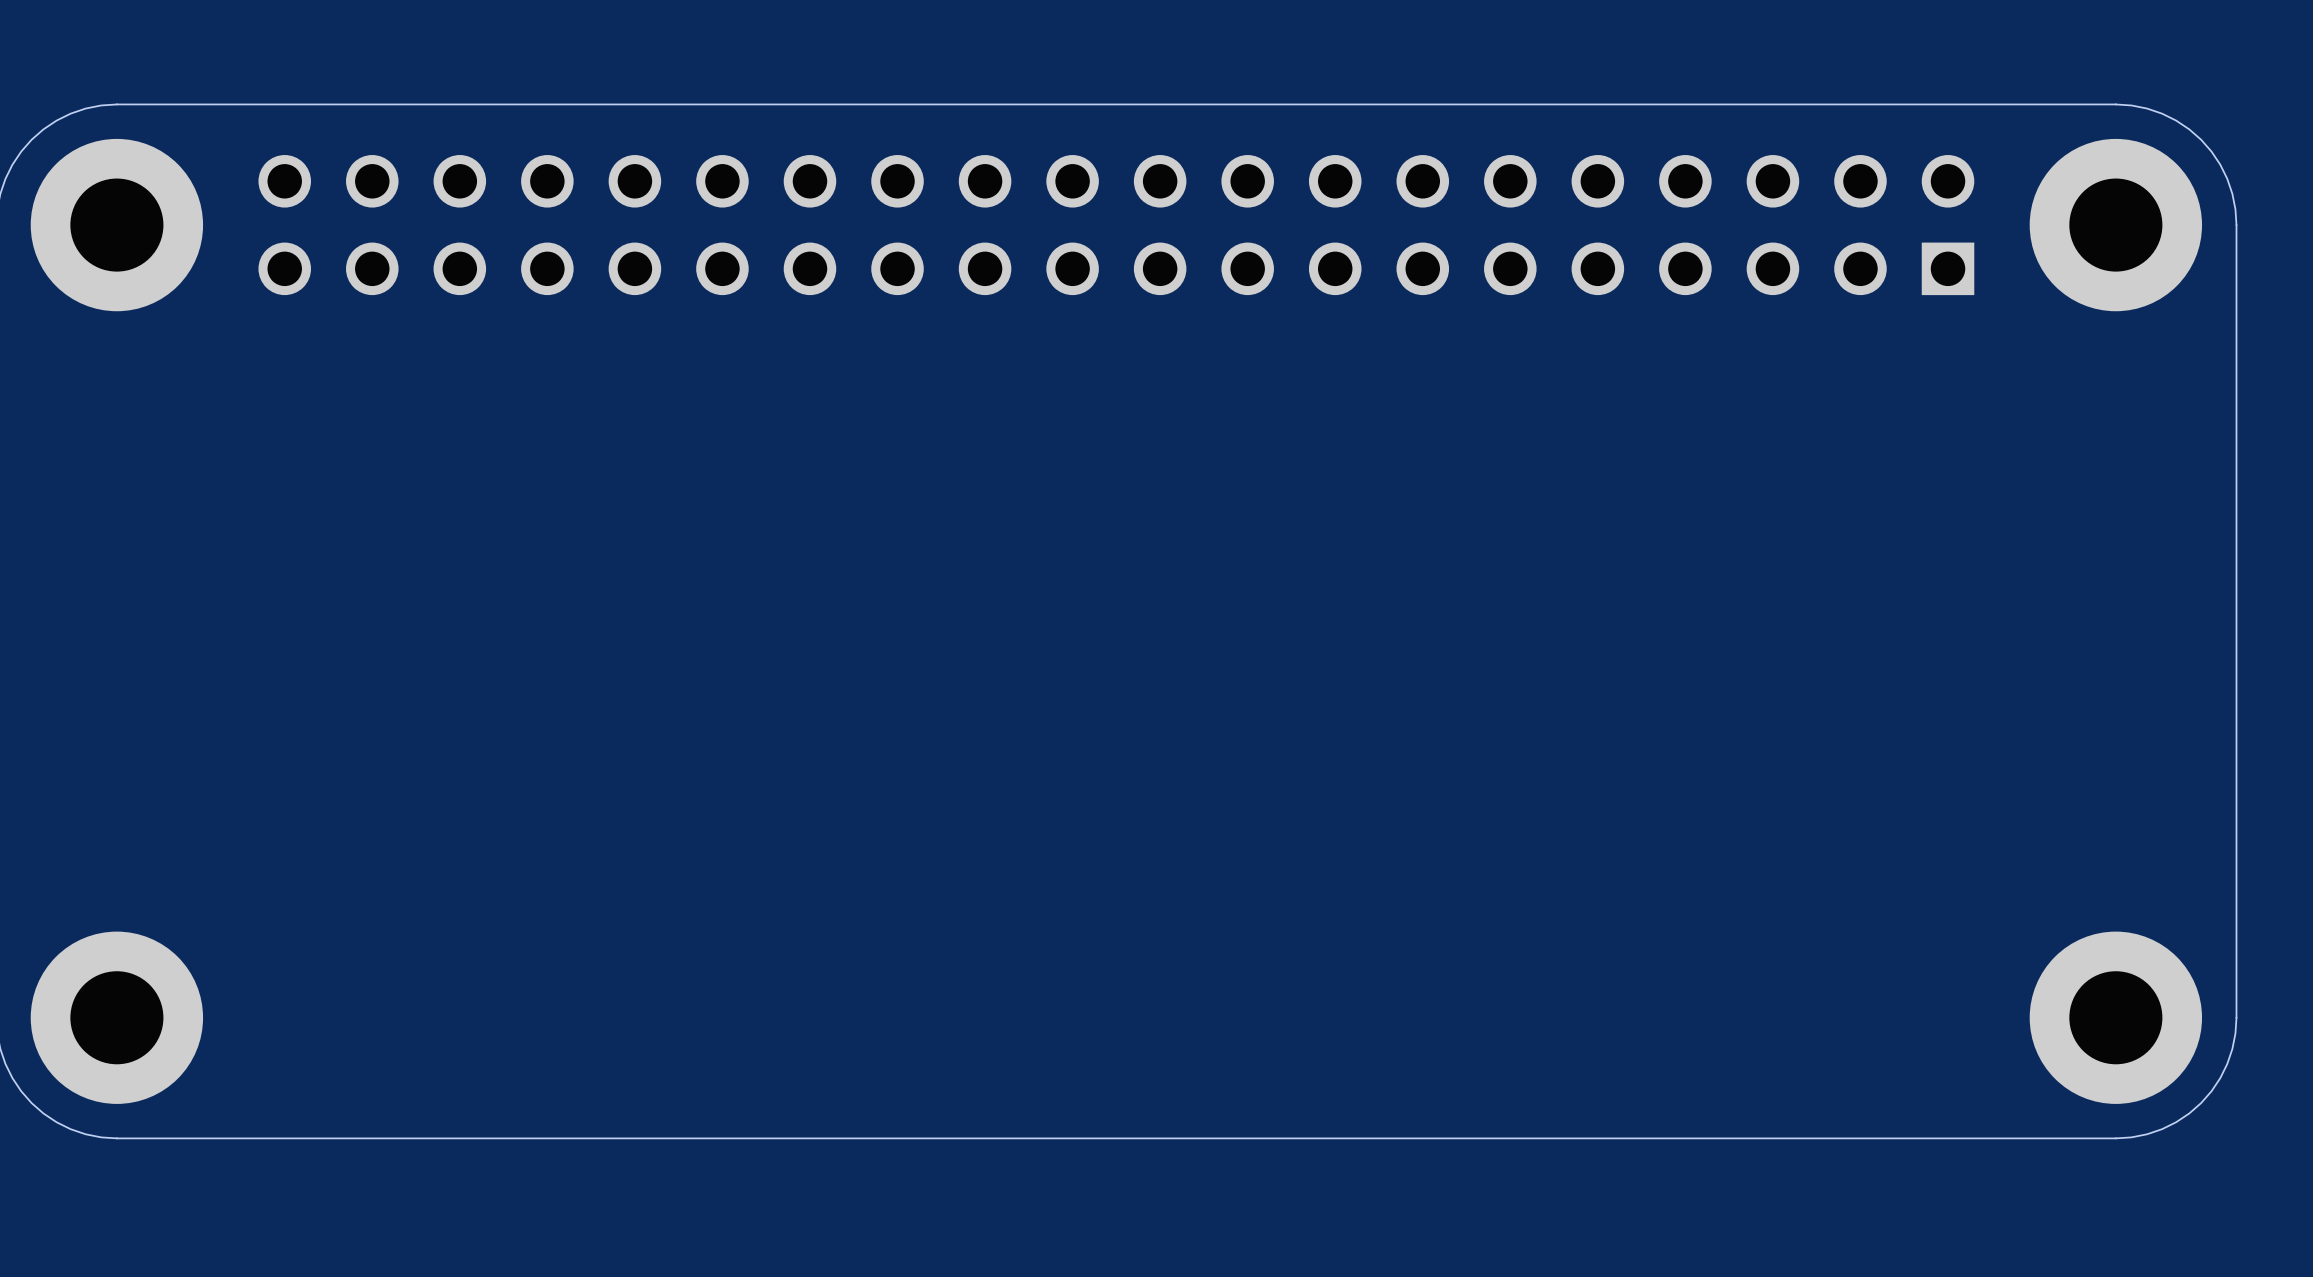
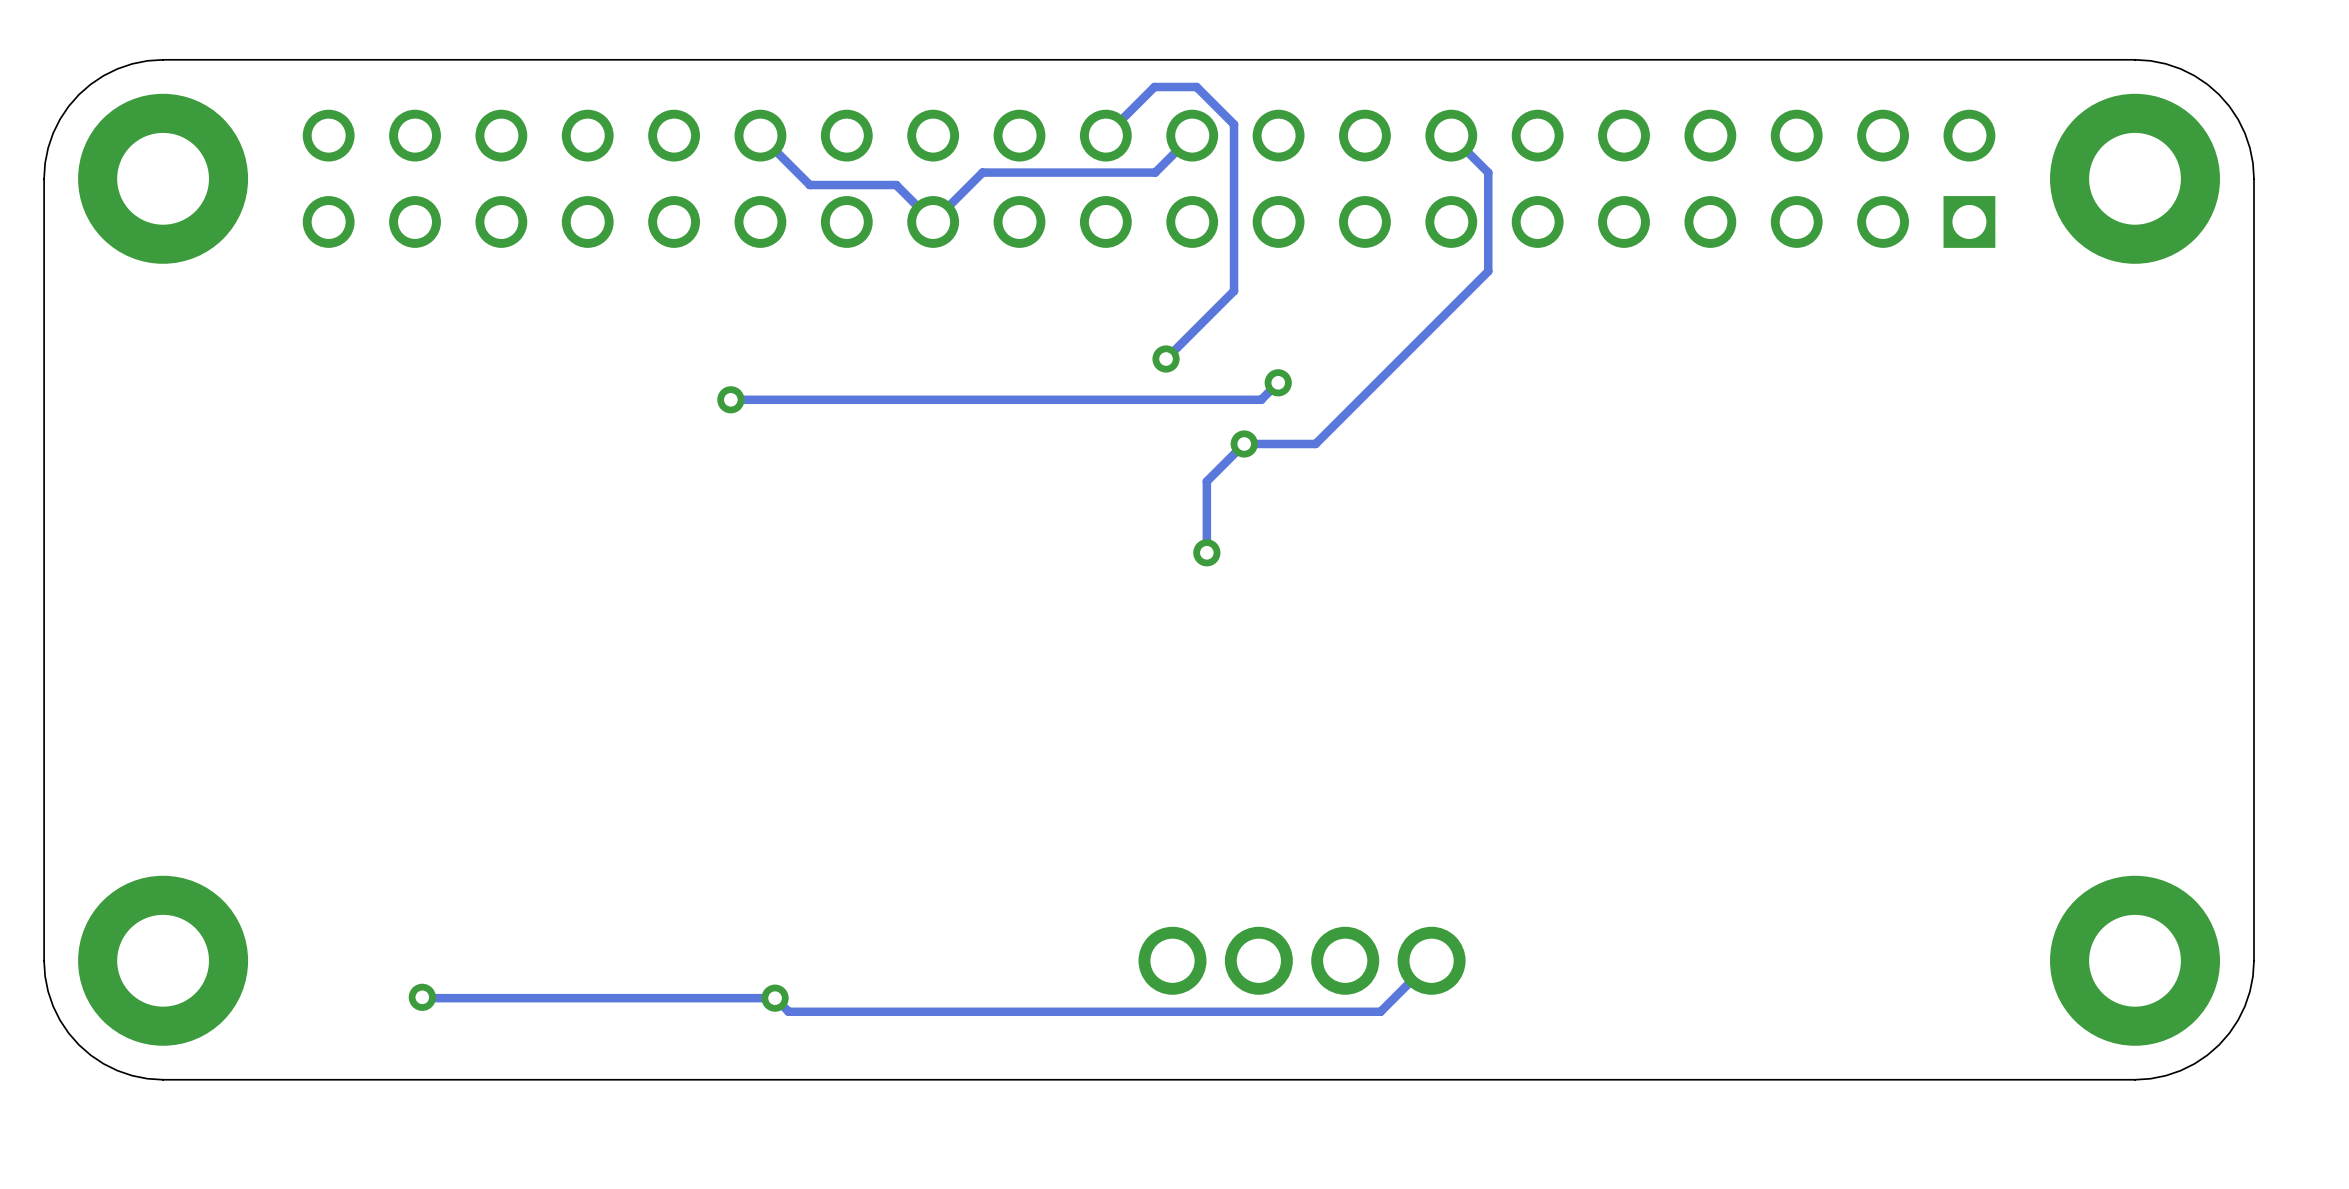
track: none -> (1105, 135) (1154, 87) (1196, 87) (1234, 124) (1234, 290) (1166, 358)
track: none -> (1192, 135) (1155, 172) (982, 172) (933, 221) (896, 185) (809, 185) (760, 135)
track: none -> (1451, 135) (1488, 172) (1488, 271) (1315, 443) (1244, 443) (1206, 481) (1206, 552)
via: none -> (1166, 358)
track: none -> (1278, 382) (1261, 399) (730, 399)
via: none -> (1278, 382)
via: none -> (730, 399)
via: none -> (1244, 443)
via: none -> (1206, 552)
part: none -> (1302, 960)
track: none -> (1431, 960) (1380, 1011) (788, 1011) (775, 998) (422, 997)
via: none -> (422, 997)
via: none -> (775, 998)

